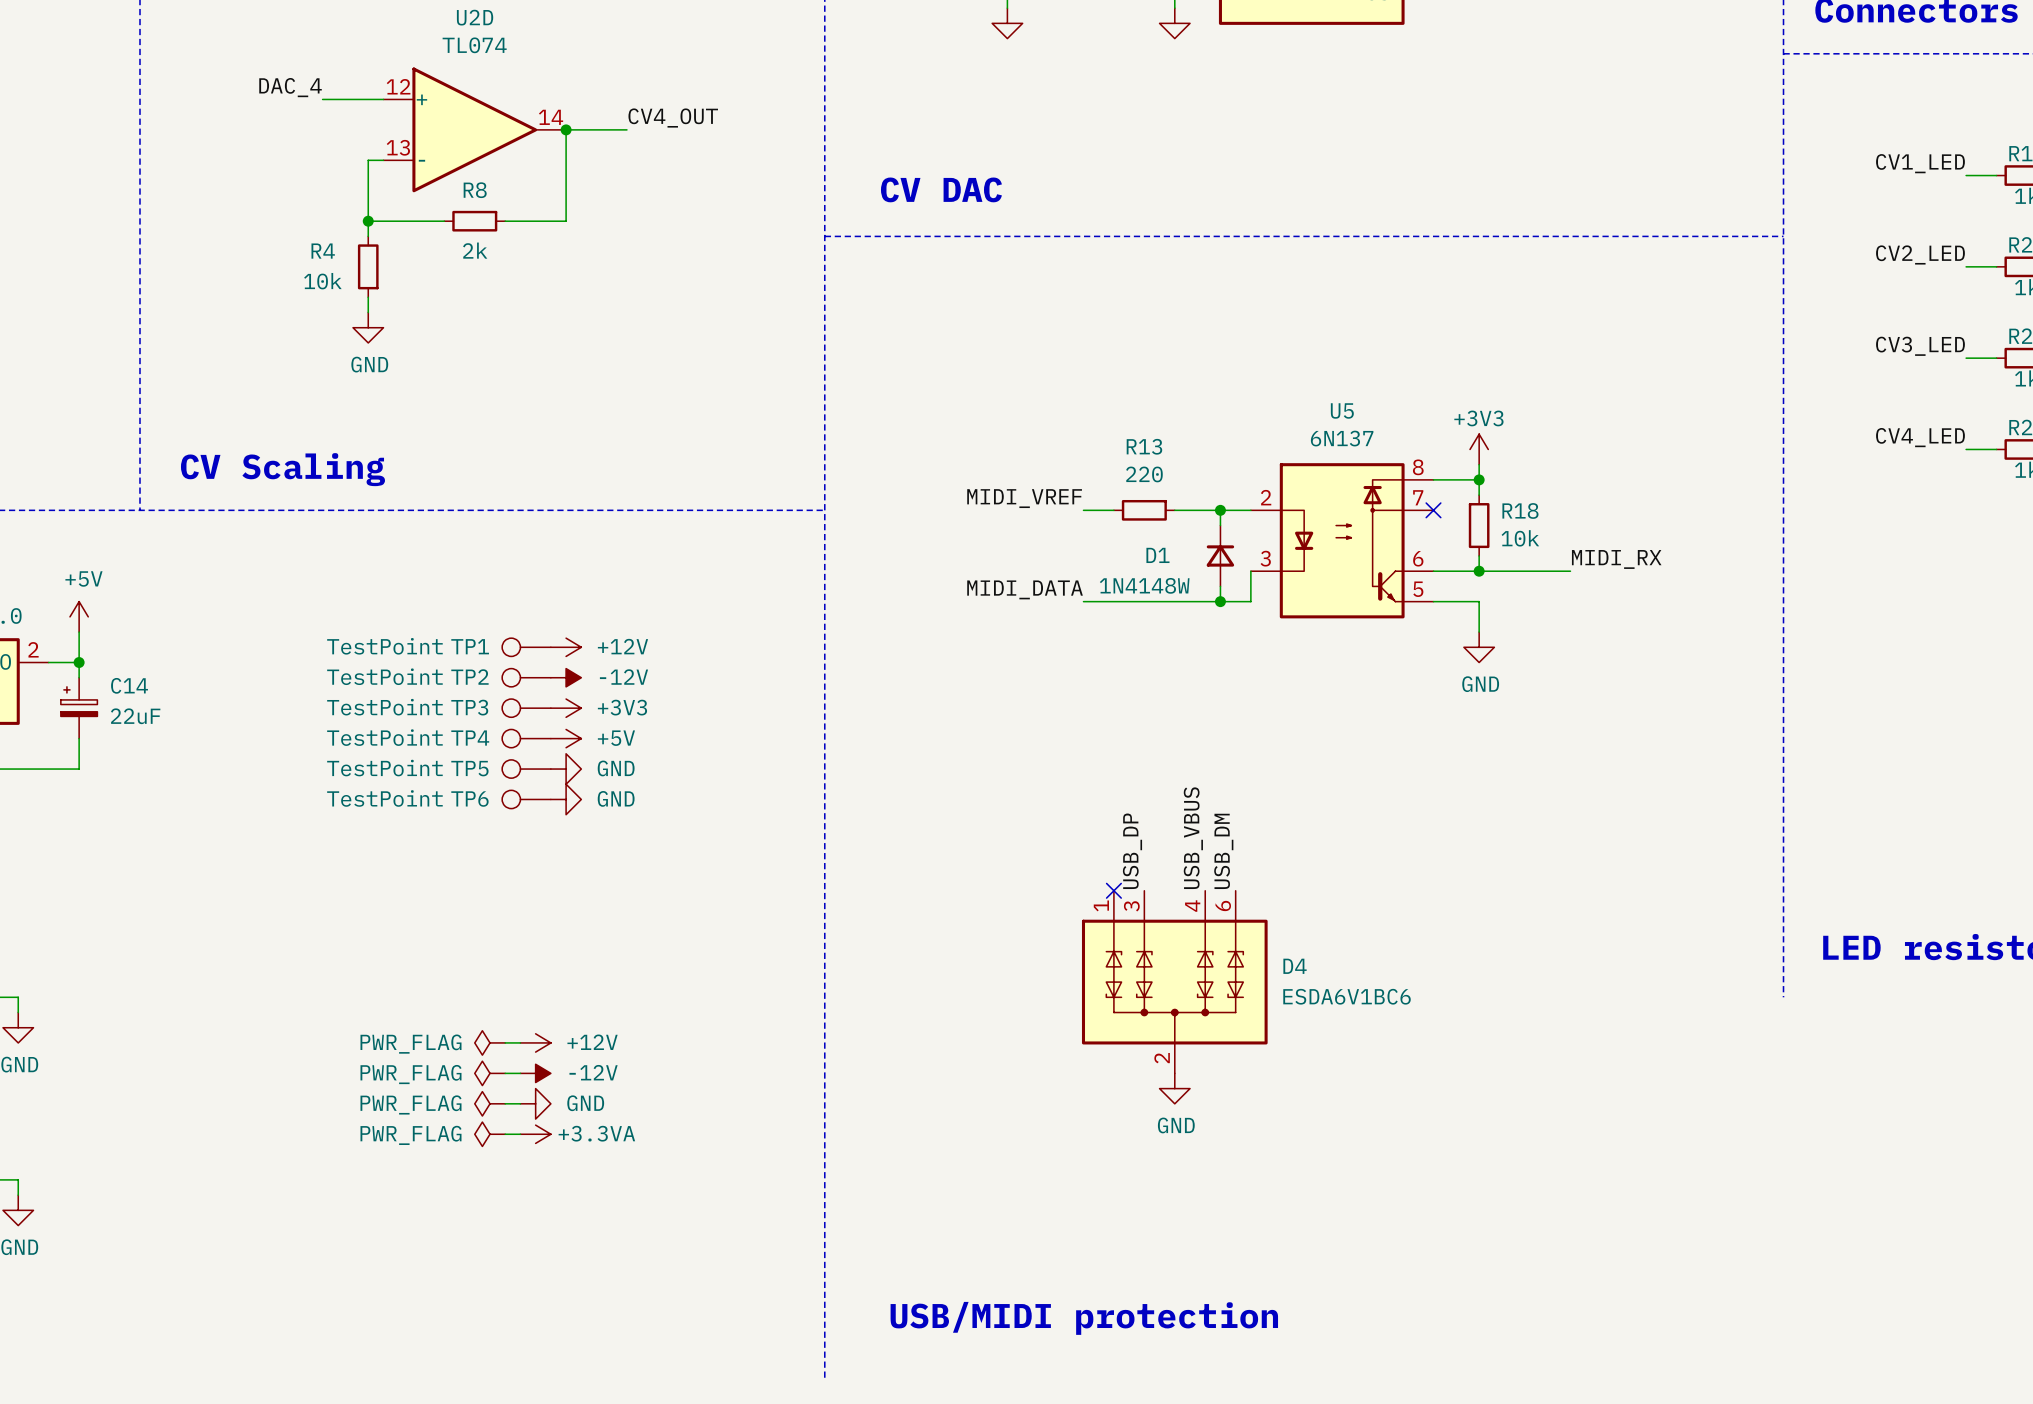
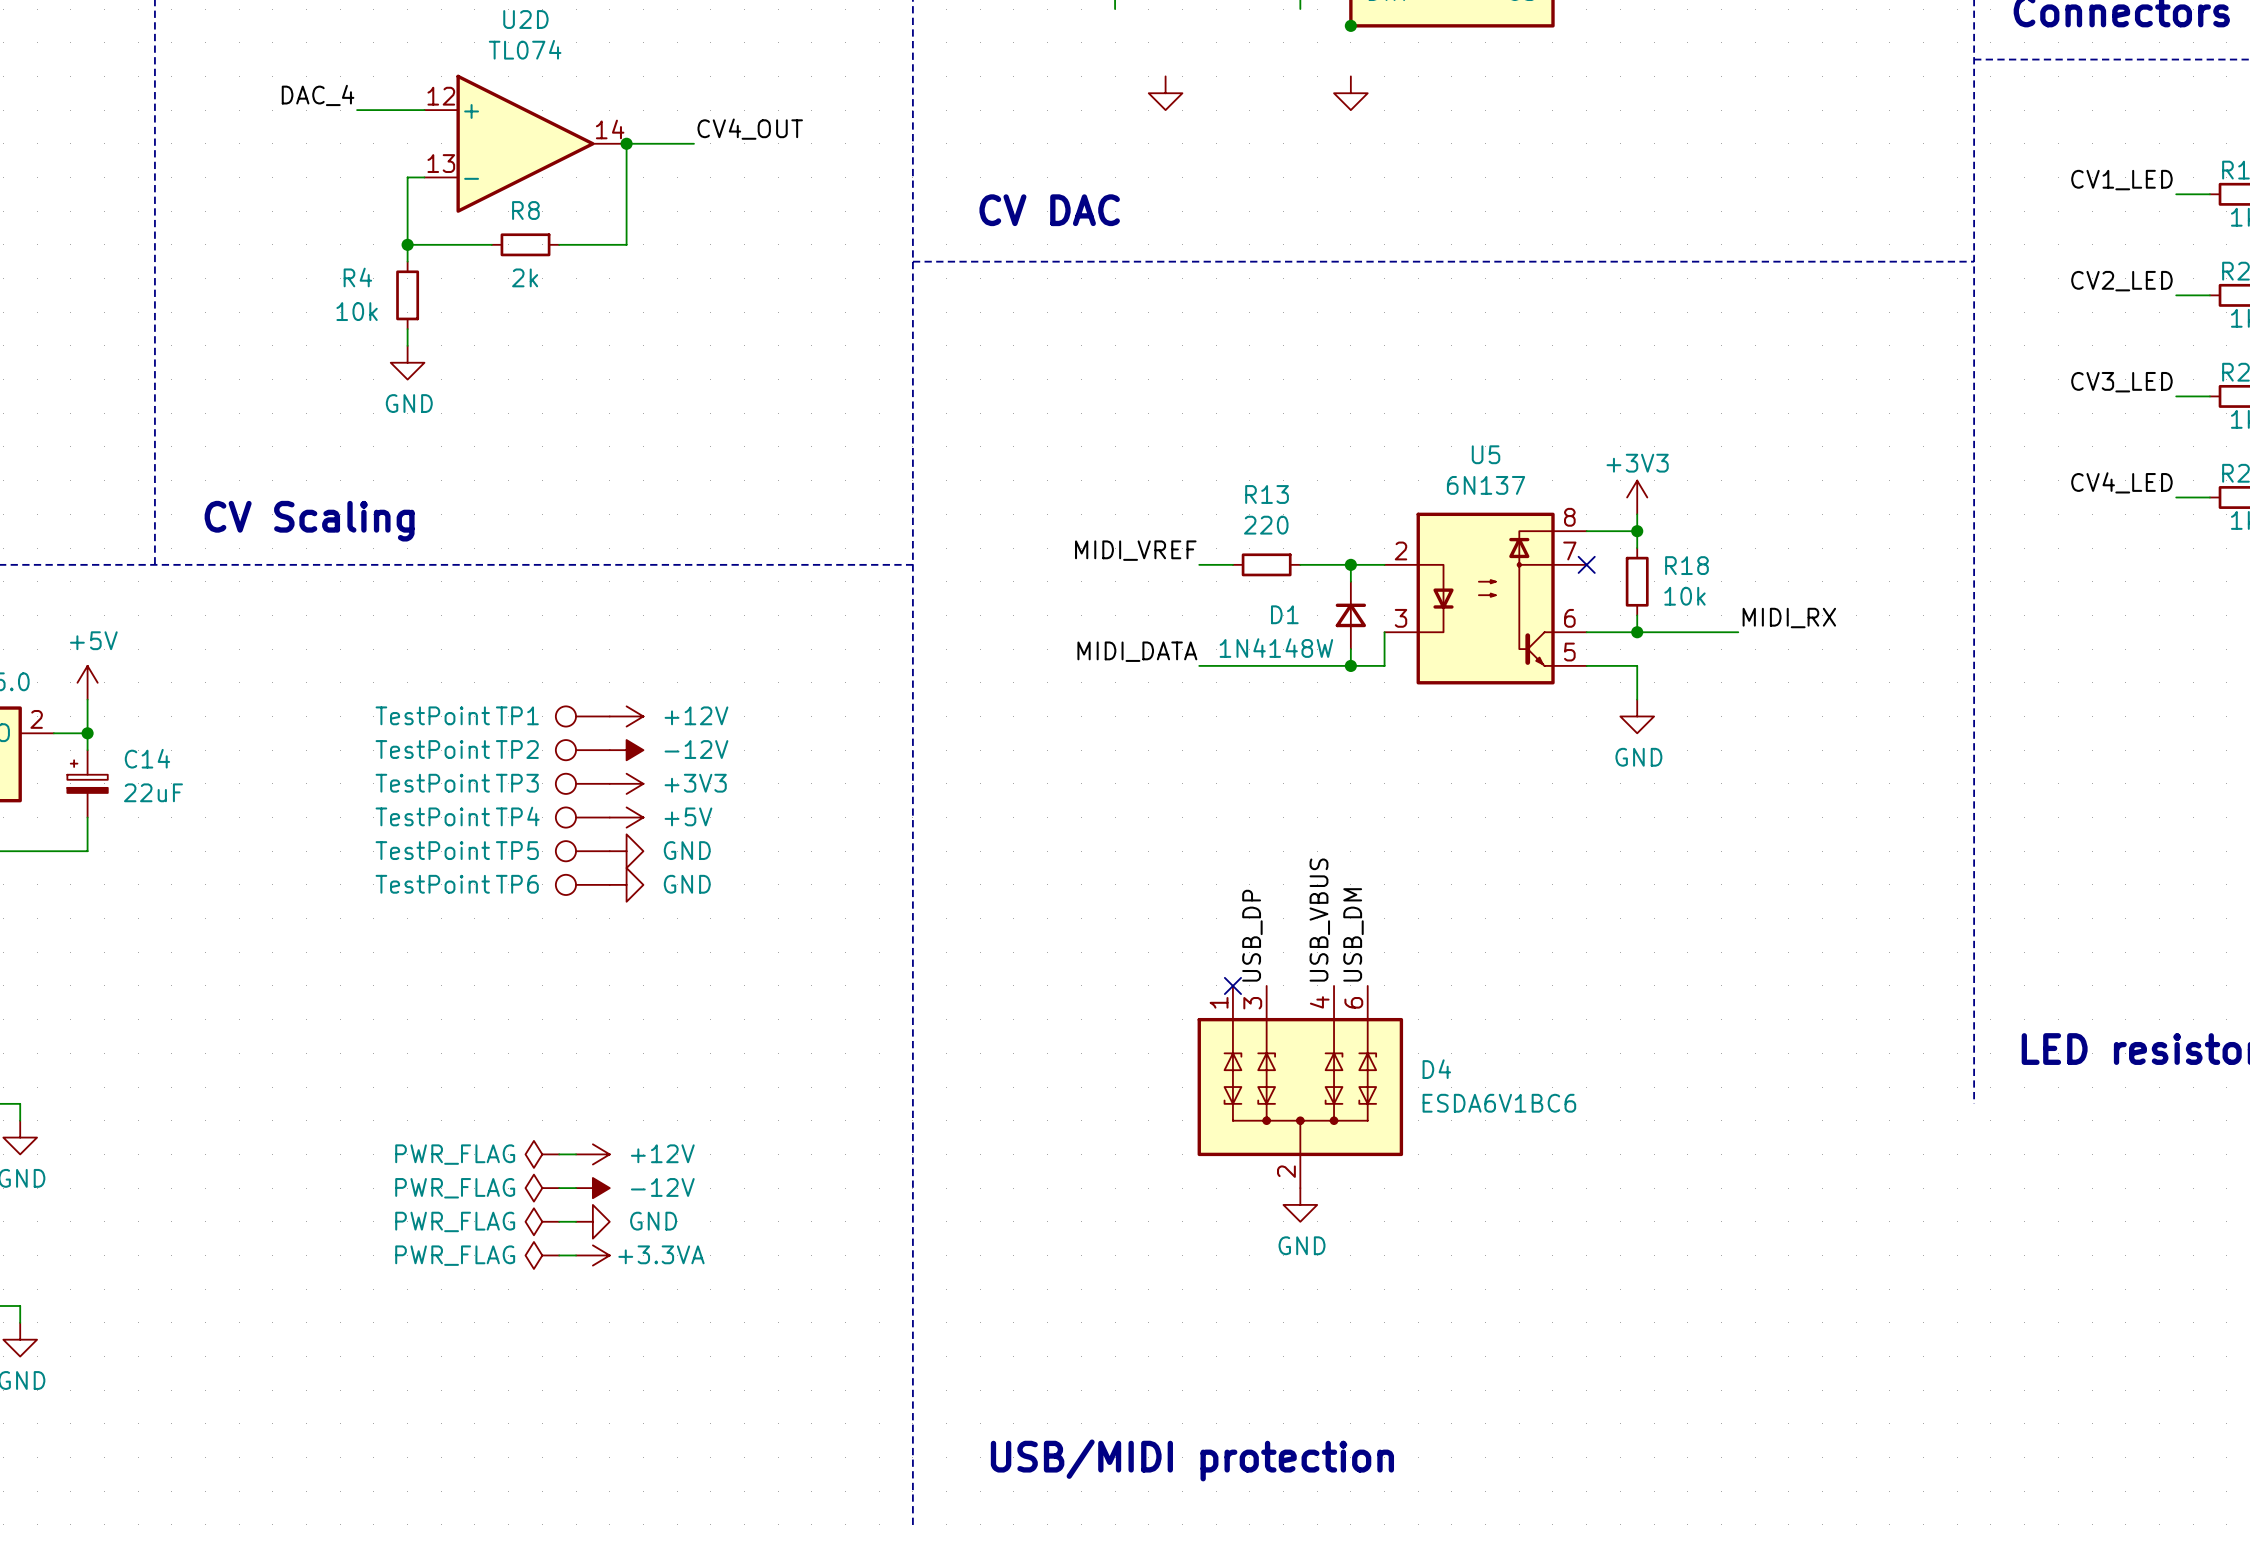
power symbol: (1007, 23) -> none
power symbol: (1174, 23) -> none
junction: none -> (1350, 25)
power symbol: none -> (1165, 93)
power symbol: none -> (1350, 93)

